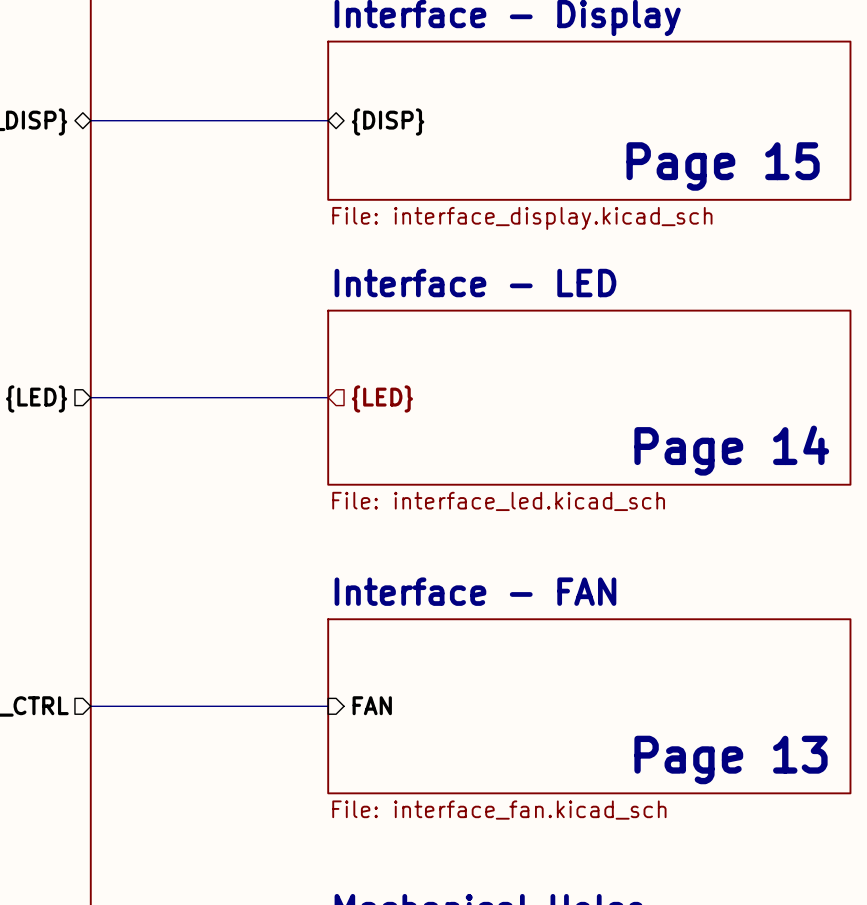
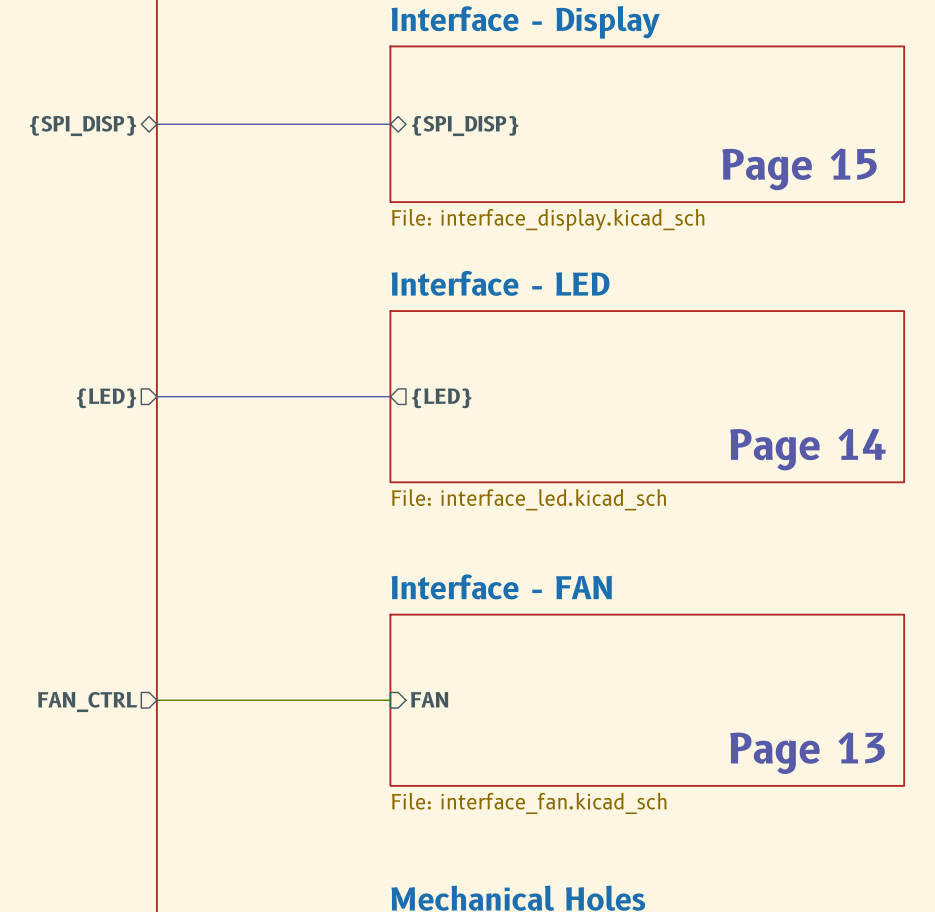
sheet pin: {DISP} (388, 122) -> {SPI_DISP} (465, 126)
hierarchical label: {LED} (382, 398) -> none
sheet pin: none -> {LED} (441, 398)

